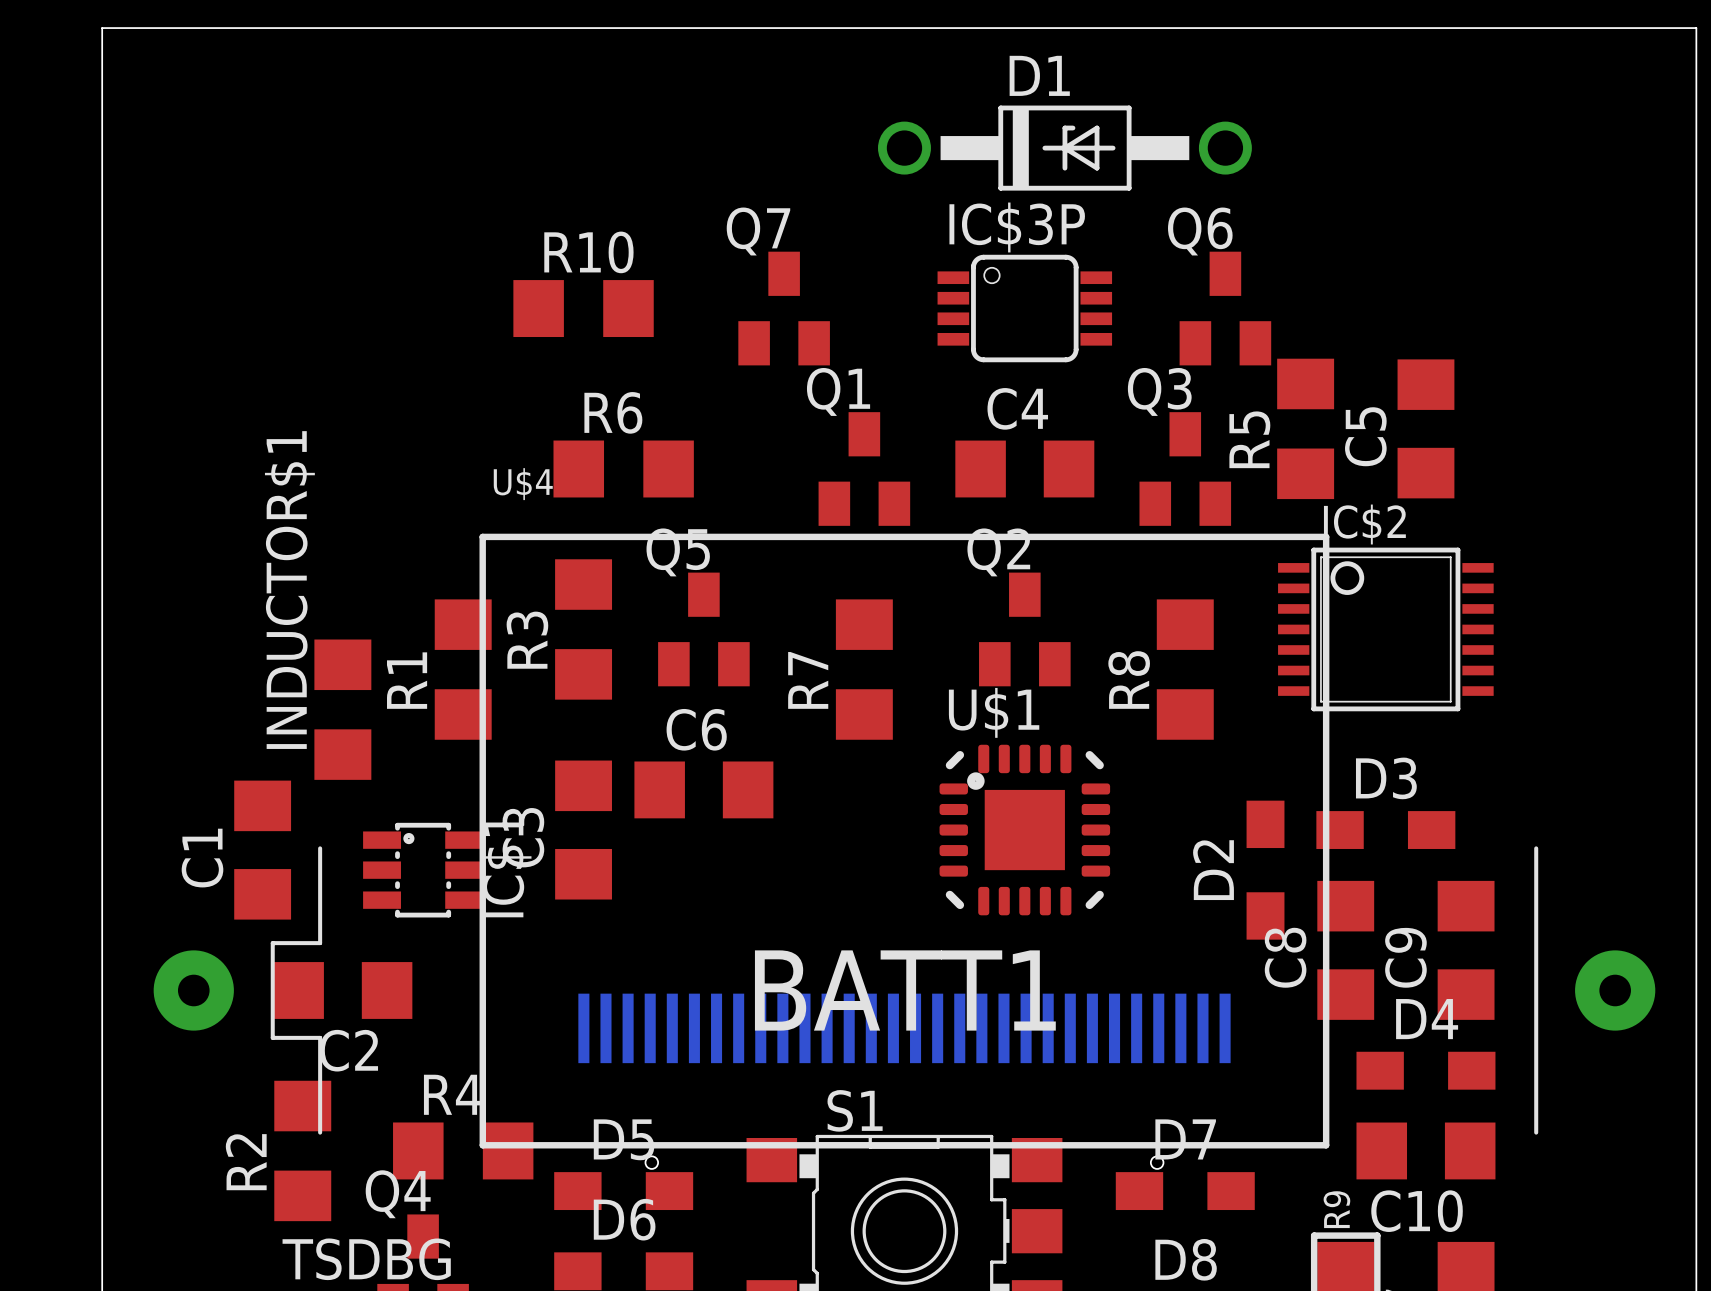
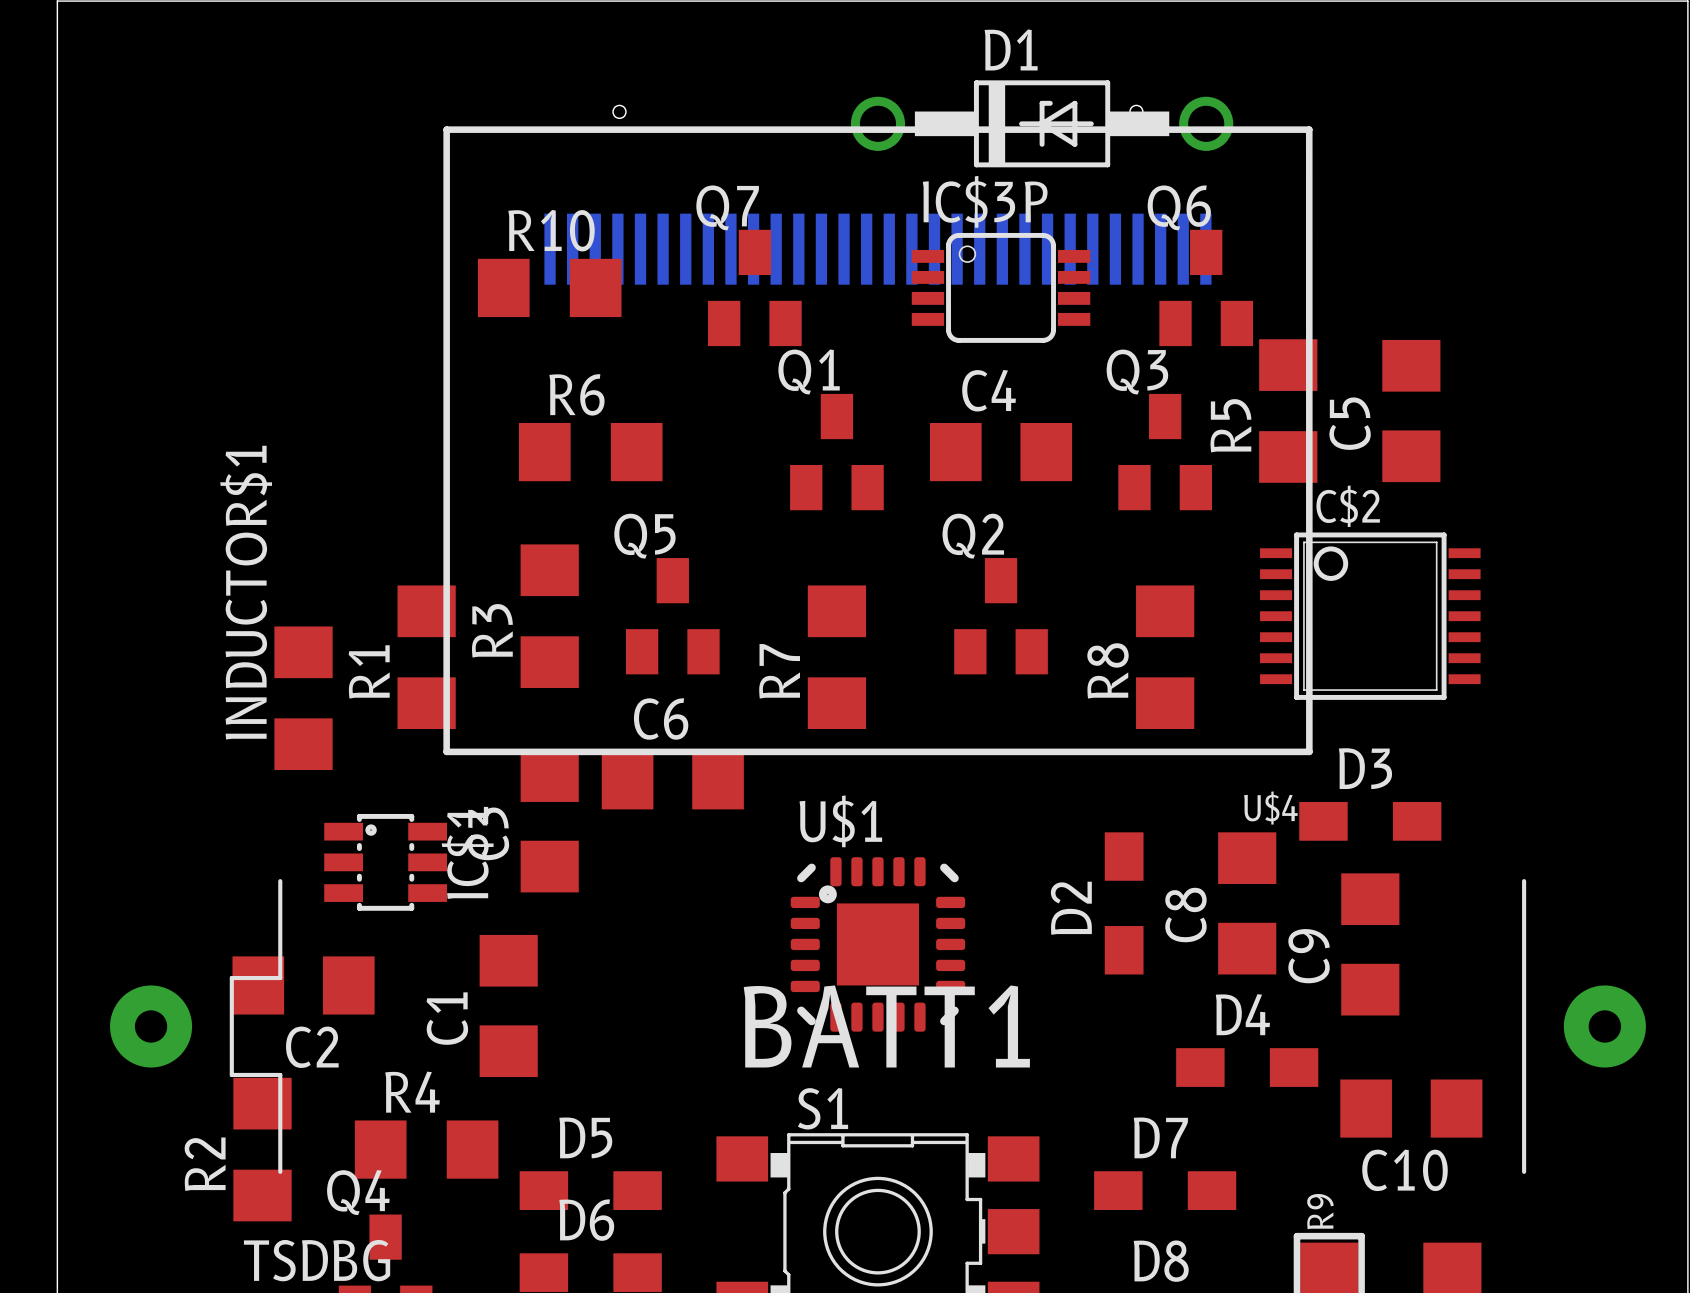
U$1 position: (1024, 830) -> (877, 944)
C1 position: (262, 850) -> (508, 1005)
U$4 rotation: 0° (904, 851) -> 180° (878, 430)
D2 position: (1265, 870) -> (1124, 903)
C8 position: (1345, 950) -> (1247, 903)
C9 position: (1466, 950) -> (1370, 944)
BATT1 position: (904, 990) -> (877, 1026)
D4 position: (1425, 1070) -> (1247, 1067)
C10 position: (1425, 1150) -> (1411, 1108)

